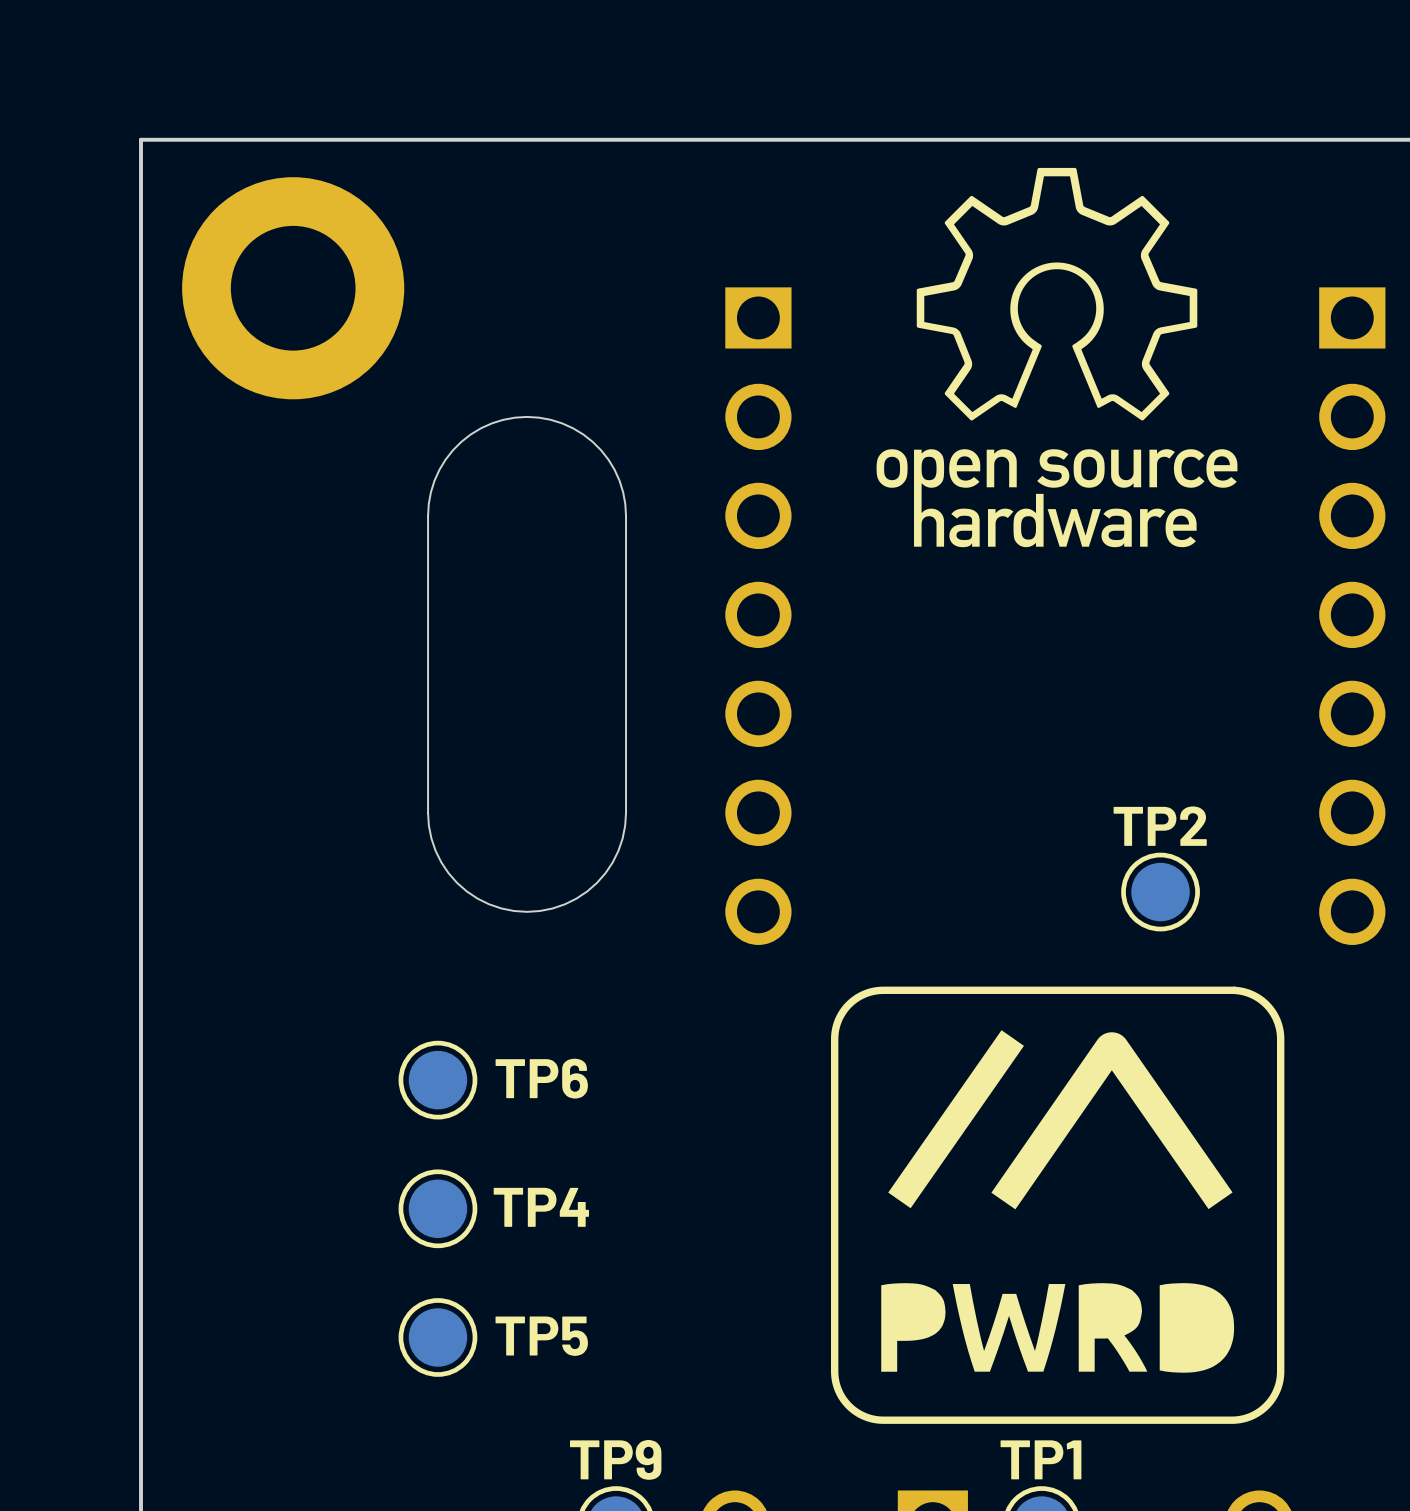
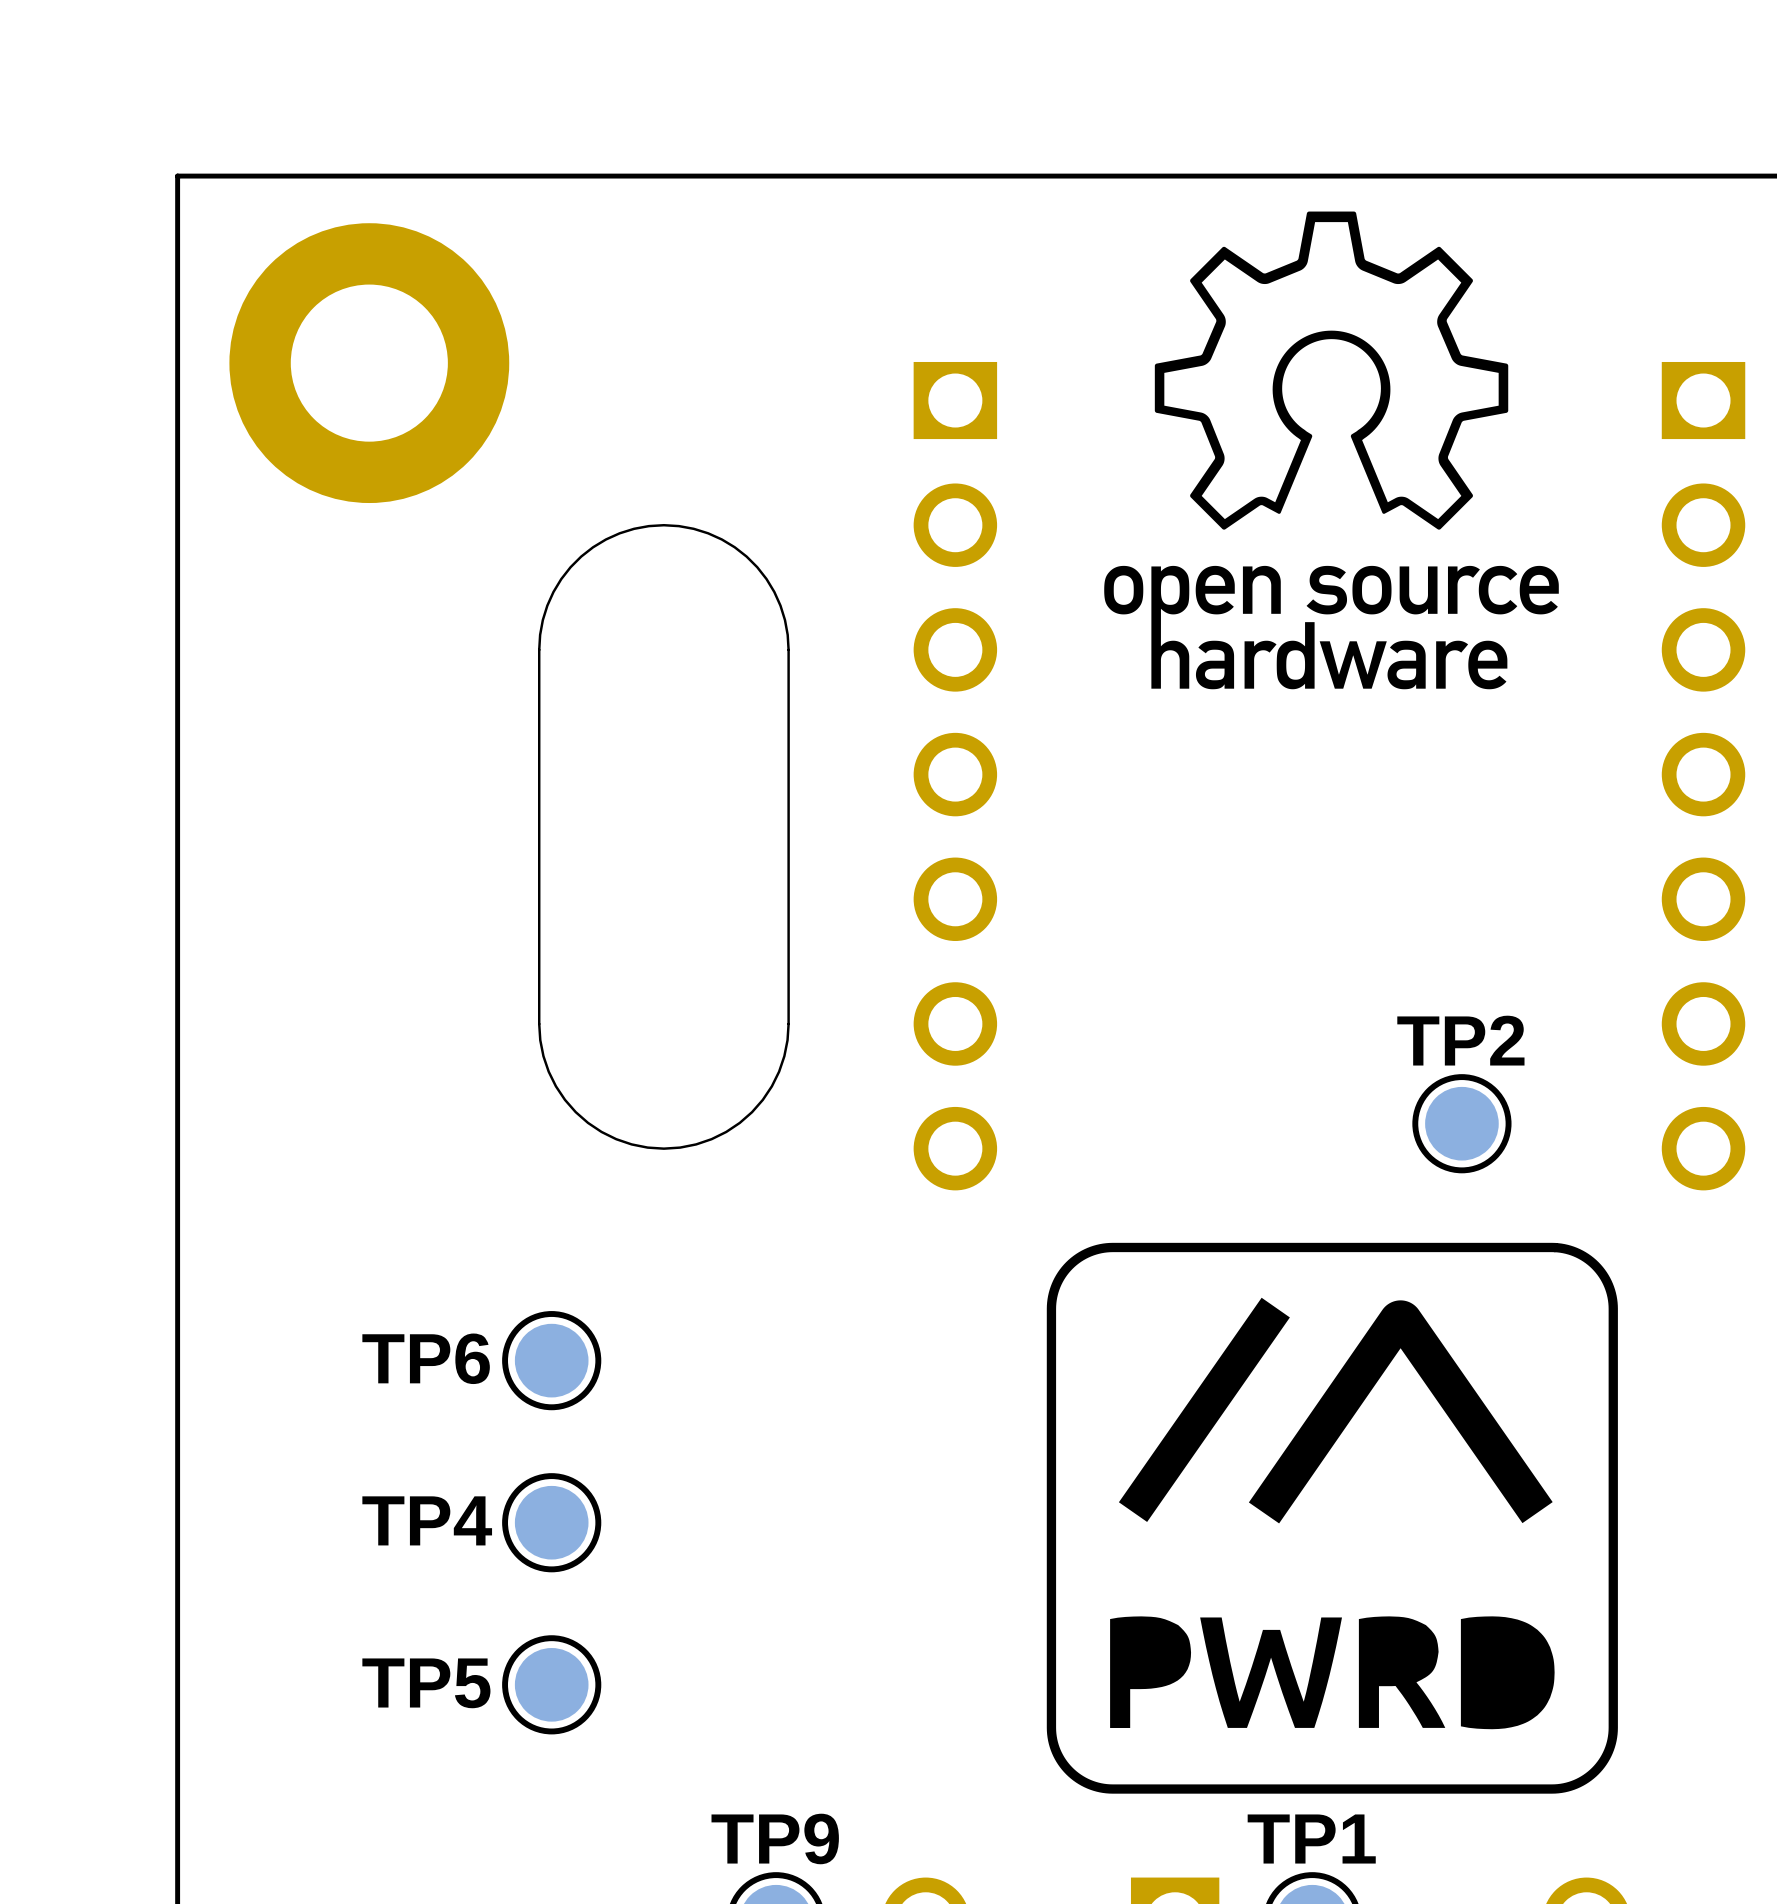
TP6 name position: TP6 (541, 1078) -> TP6 (426, 1358)
TP4 name position: TP4 (541, 1207) -> TP4 (427, 1520)
TP5 name position: TP5 (541, 1336) -> TP5 (426, 1683)

